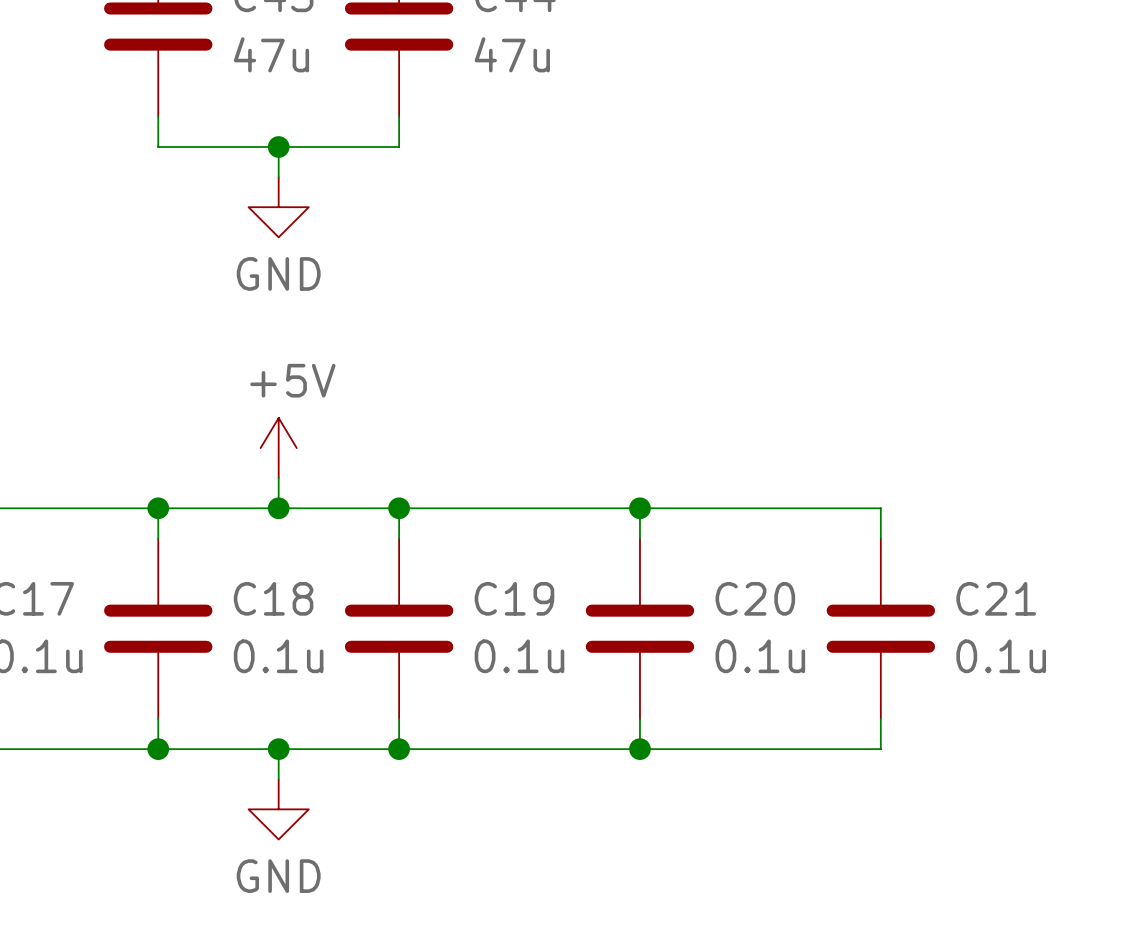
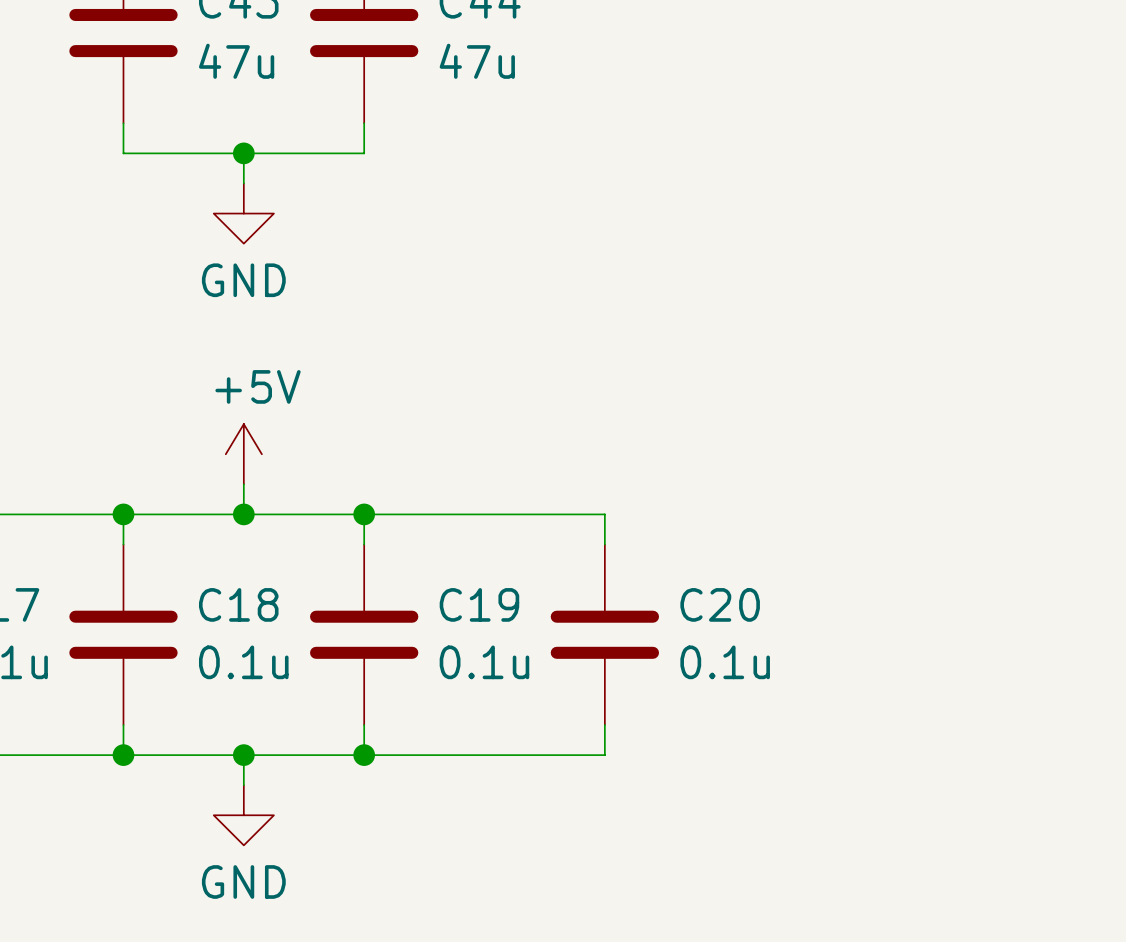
wire: (639, 508) (880, 508) (880, 538) -> none
junction: (639, 508) -> none
C21: 0.1u (880, 628) -> none
wire: (880, 719) (880, 749) (639, 749) -> none
junction: (639, 749) -> none

